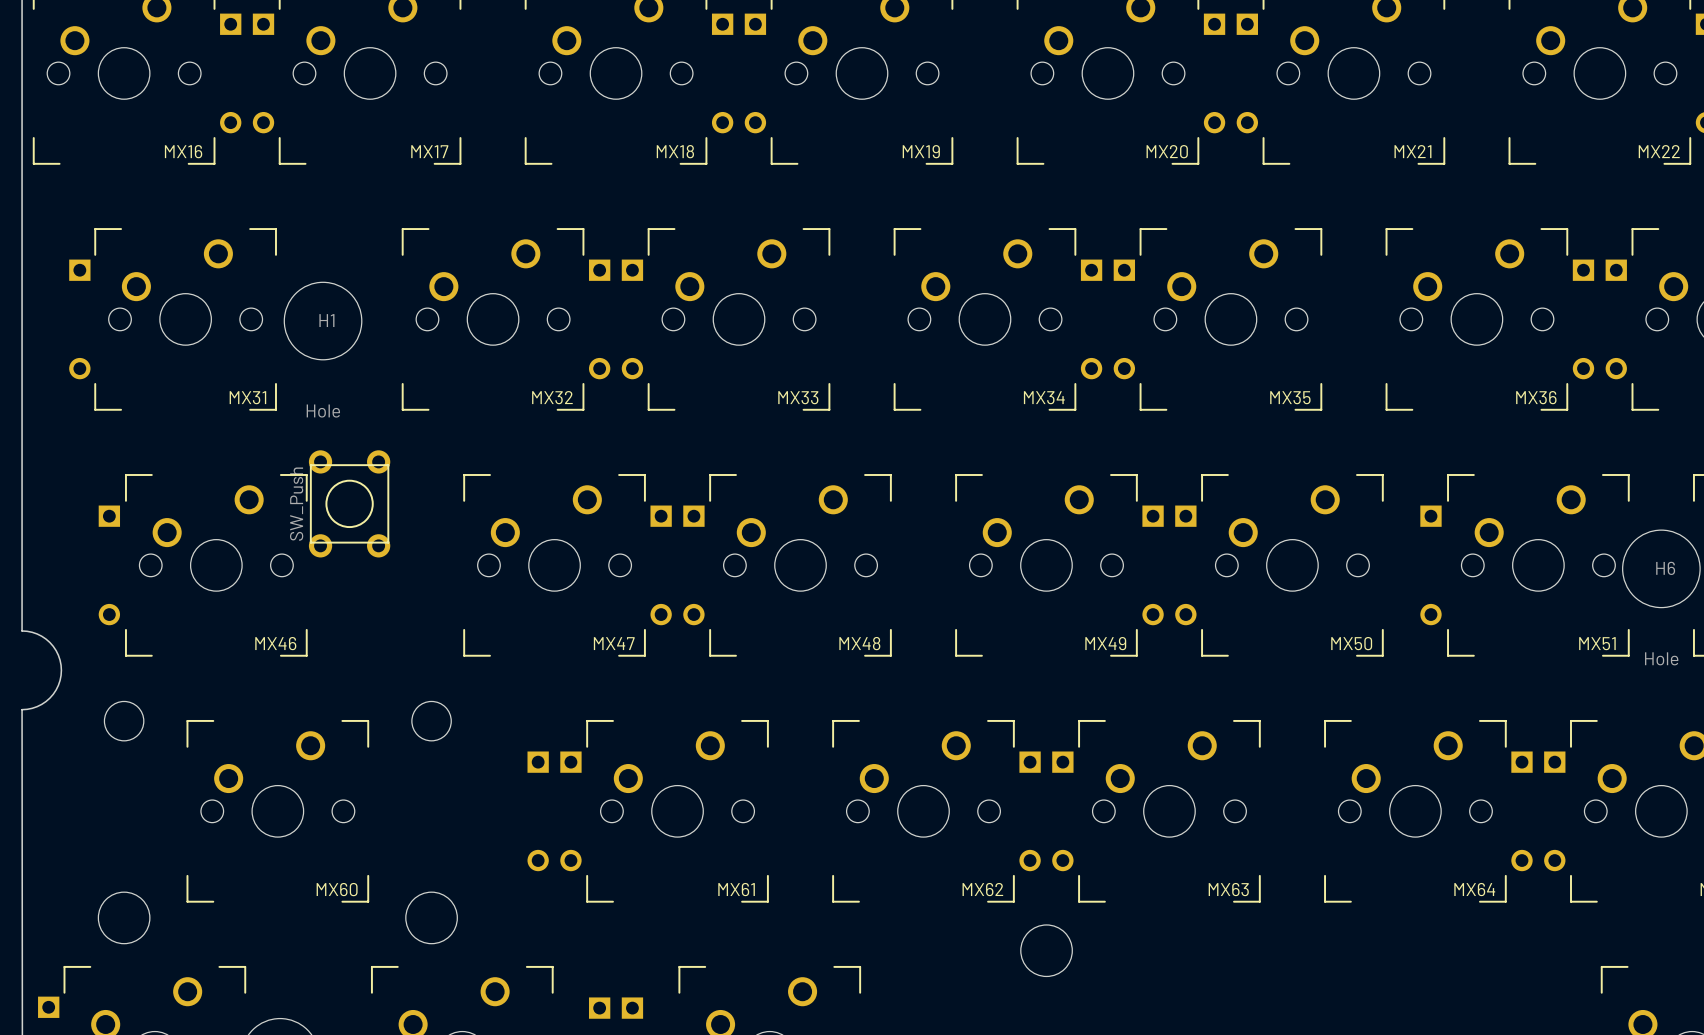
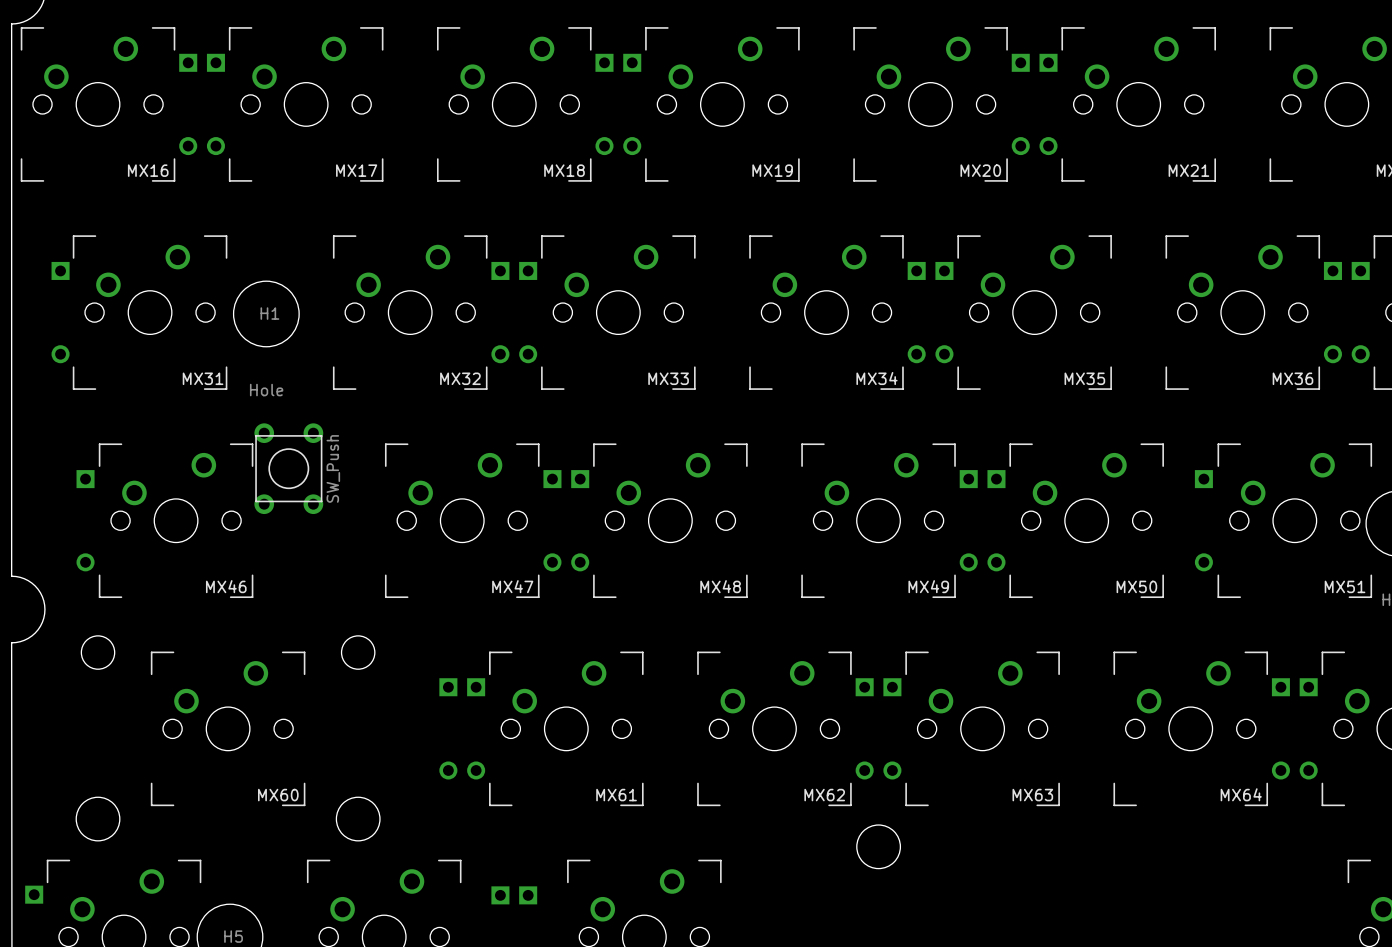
part value position: SW_Push (296, 504) -> SW_Push (333, 468)

